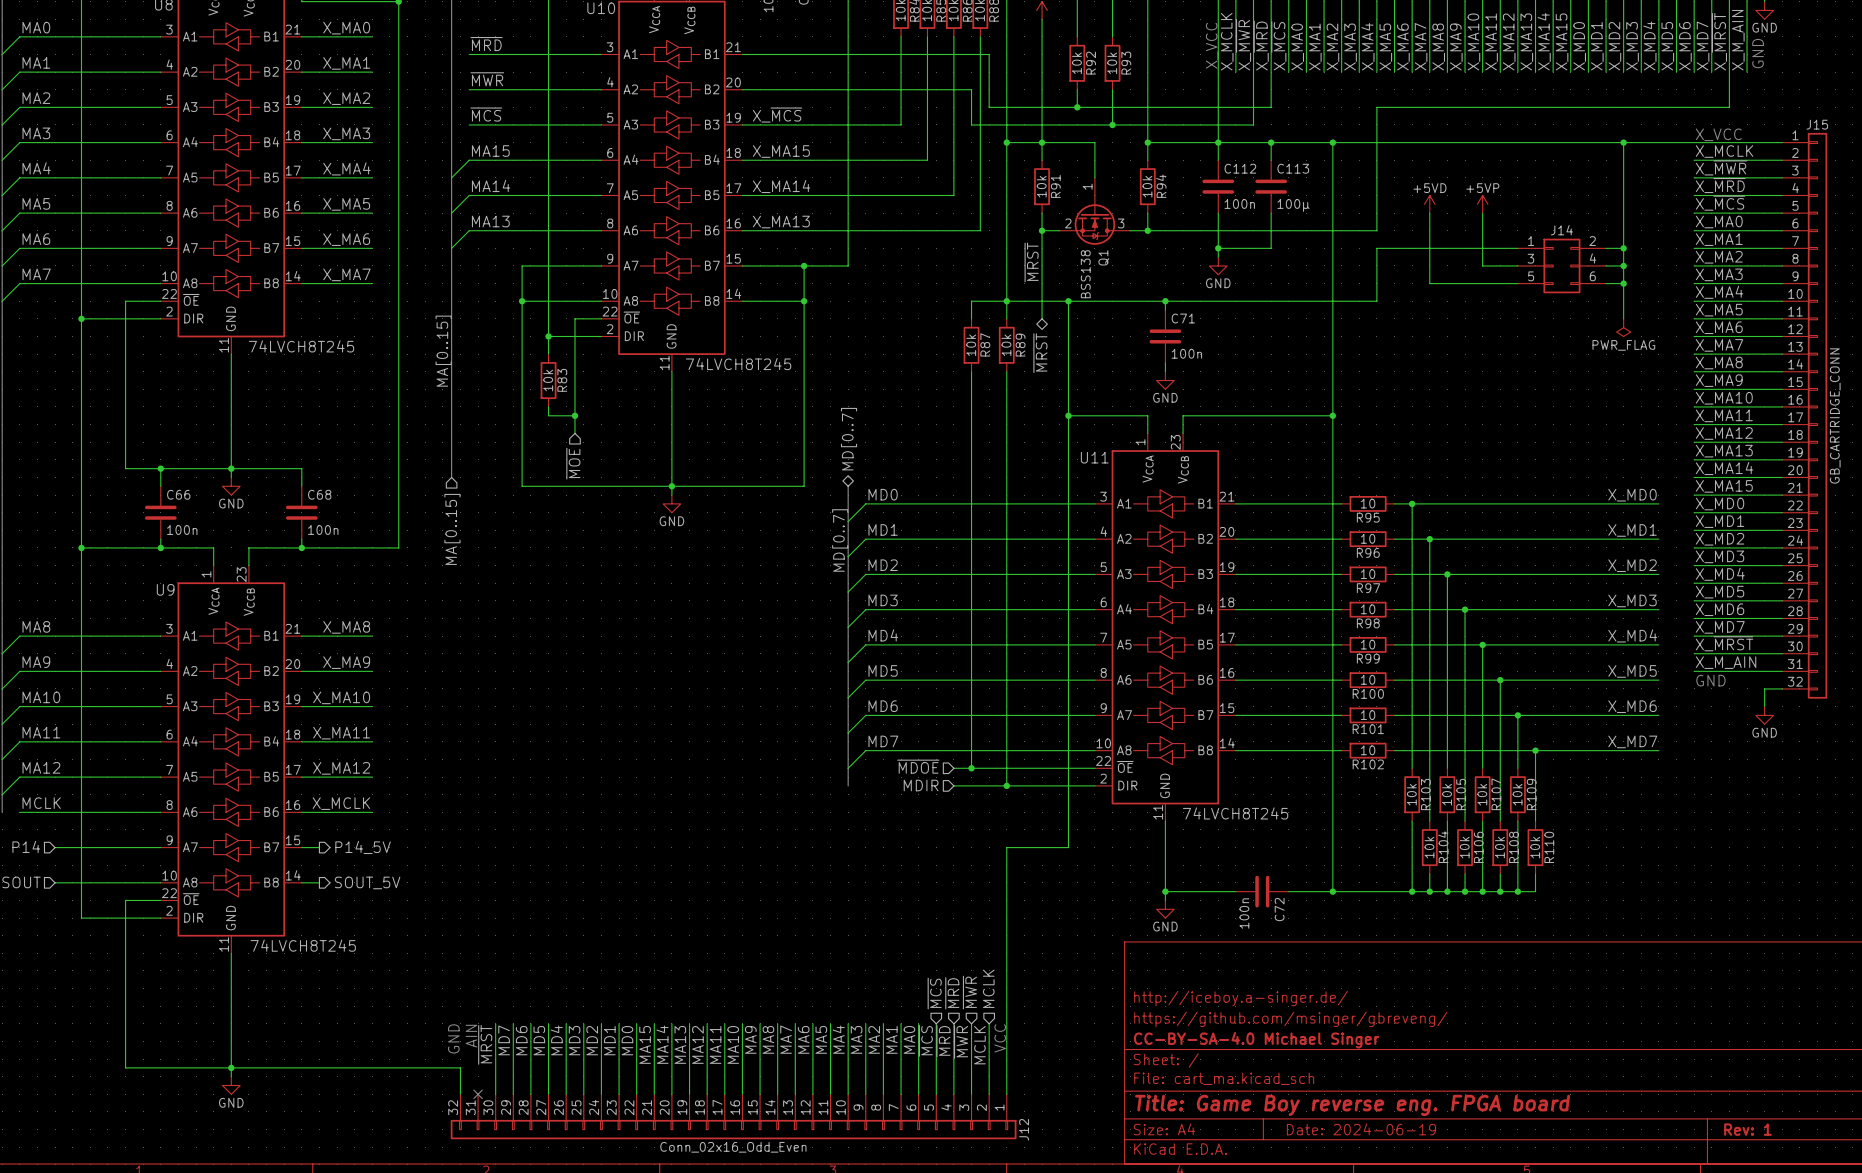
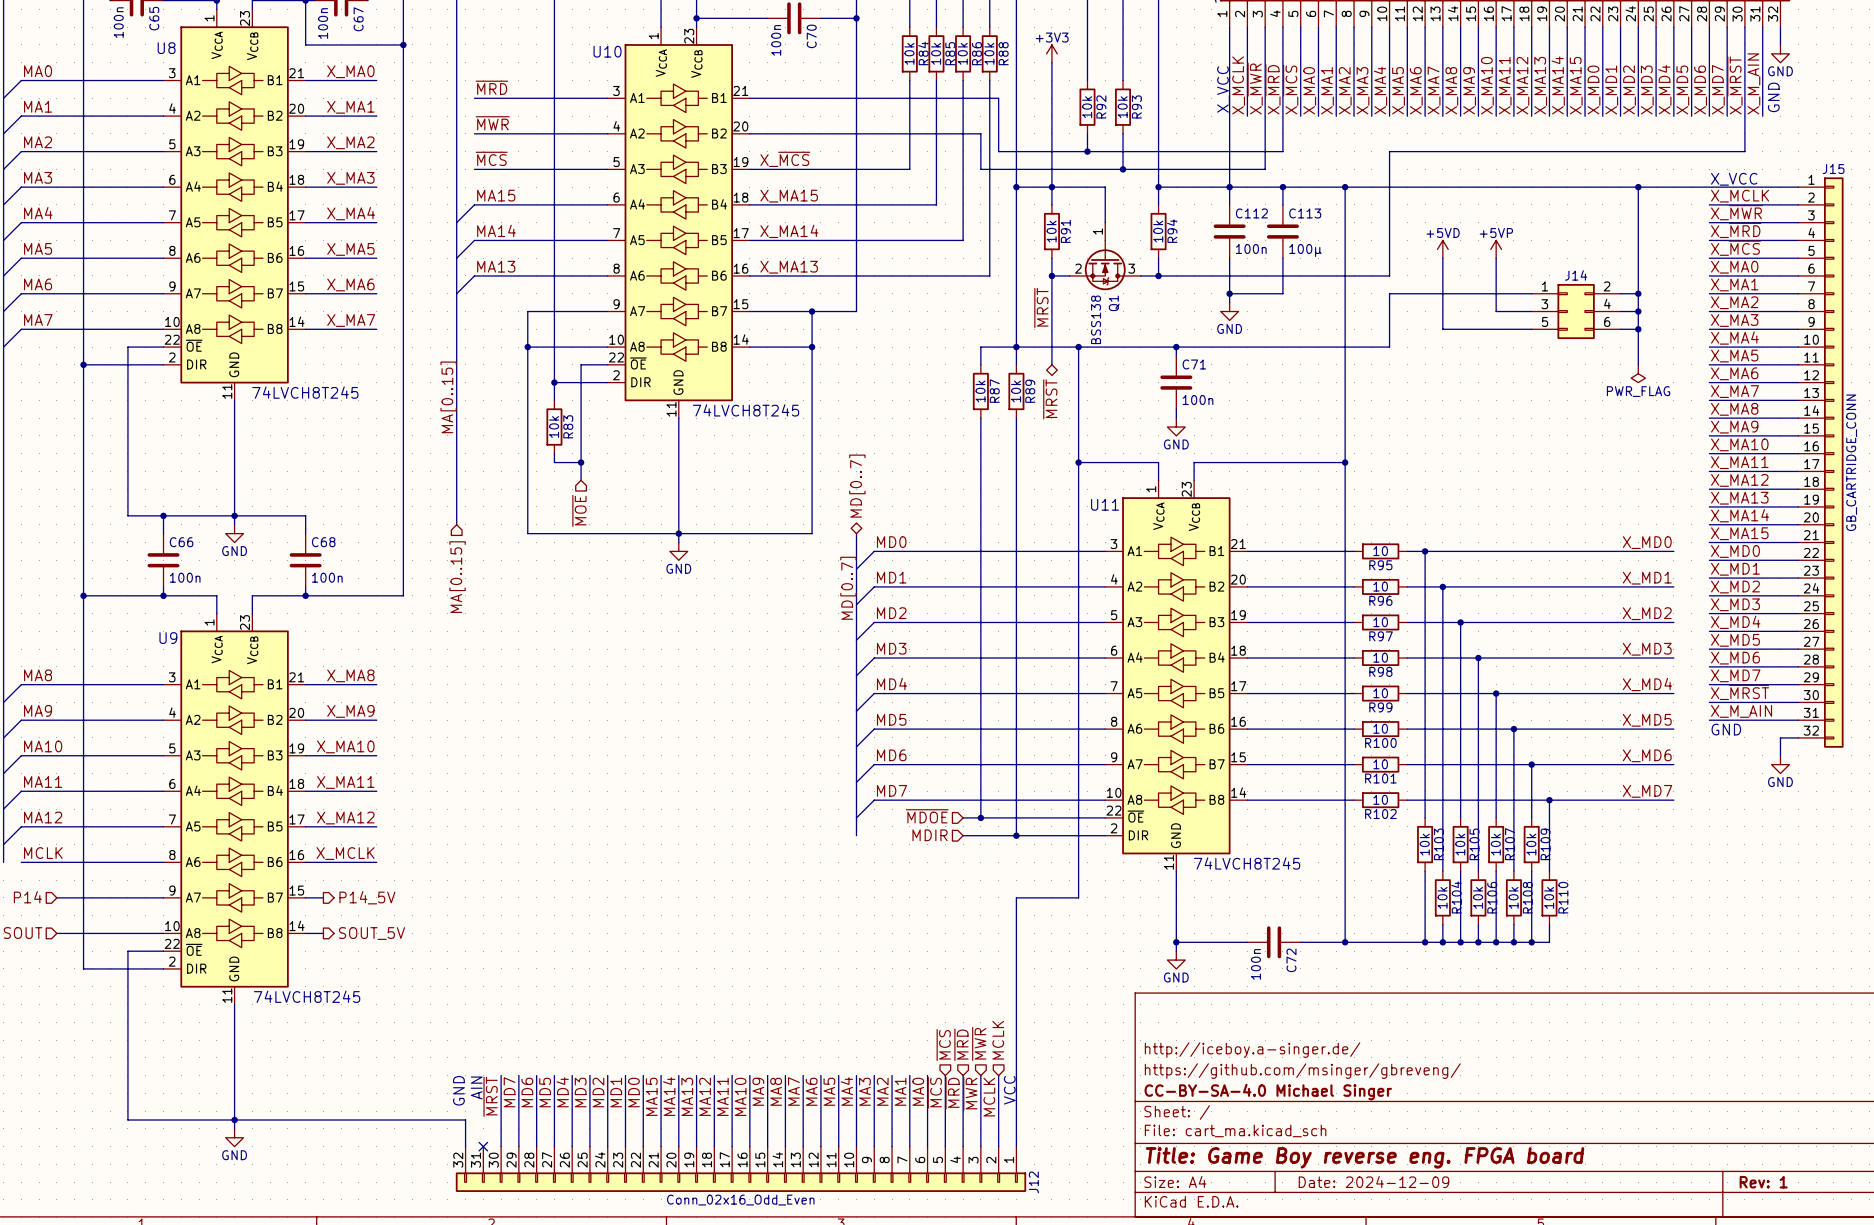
title block: Date: 2024-06-19 (1361, 1129) -> Date: 2024-12-09 (1373, 1181)

